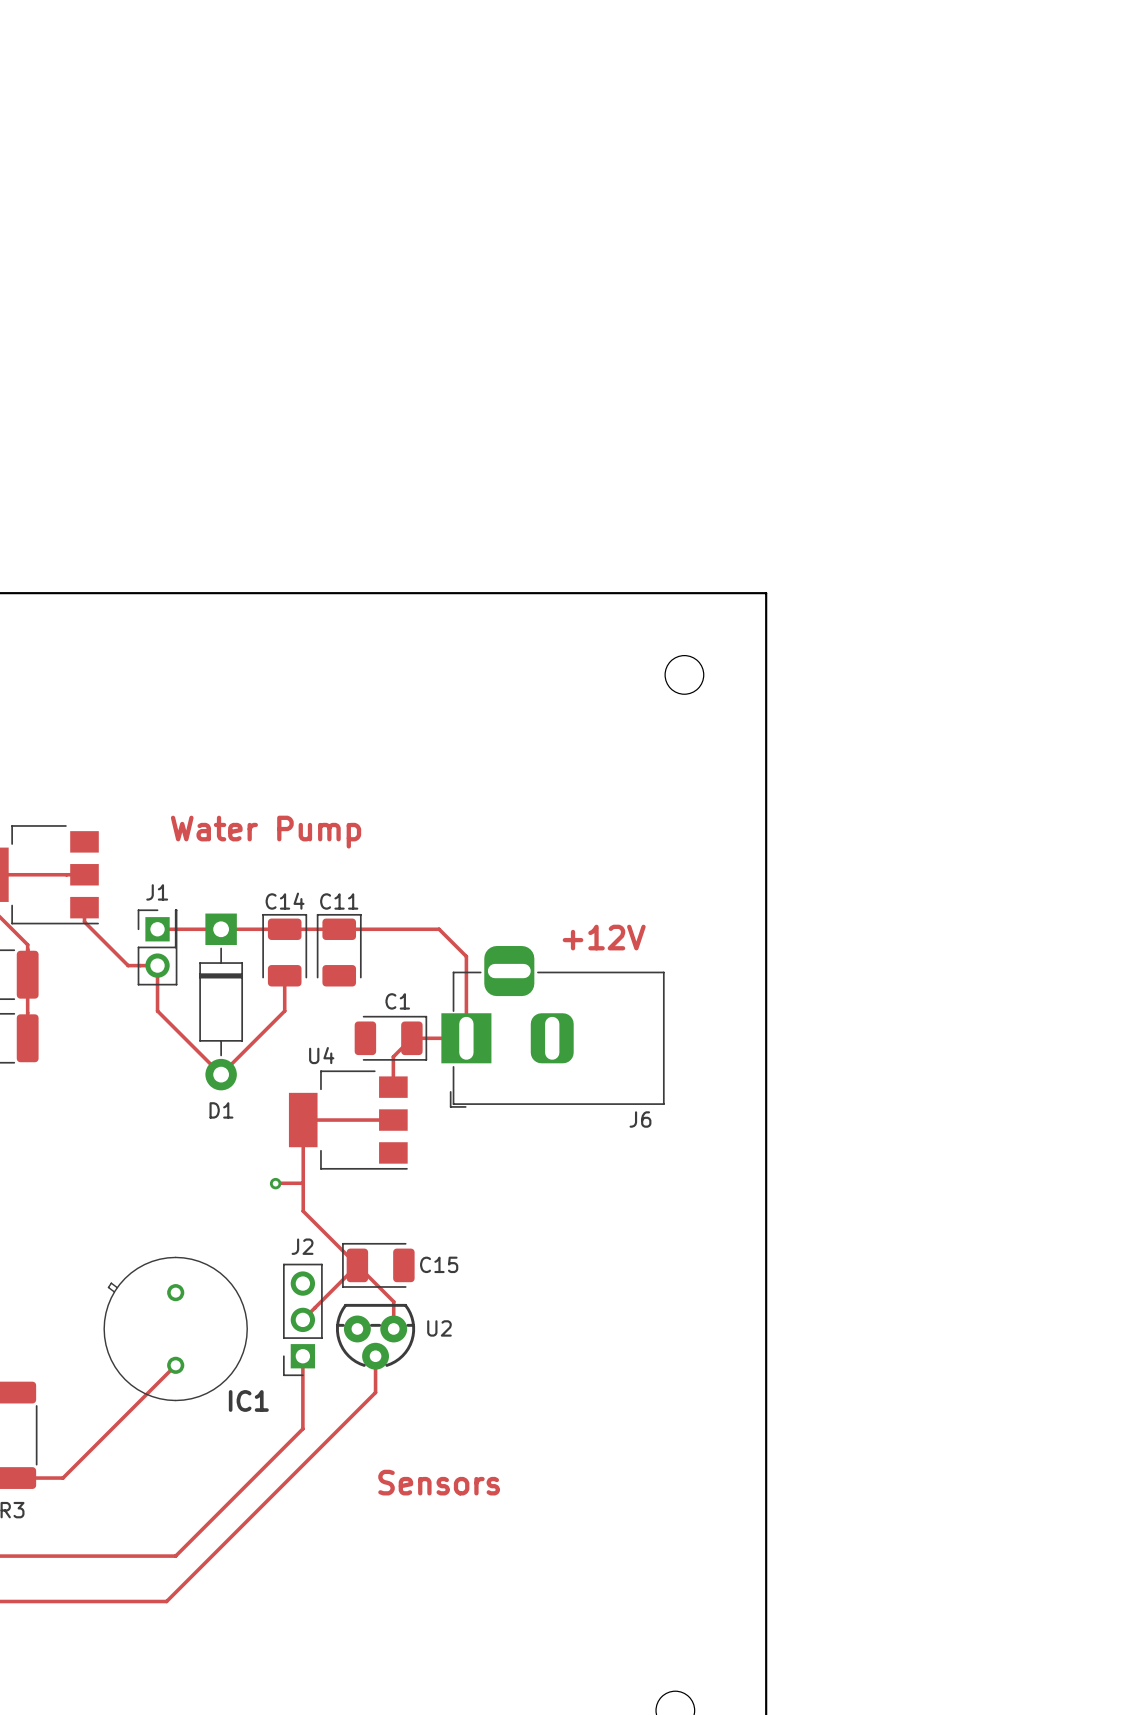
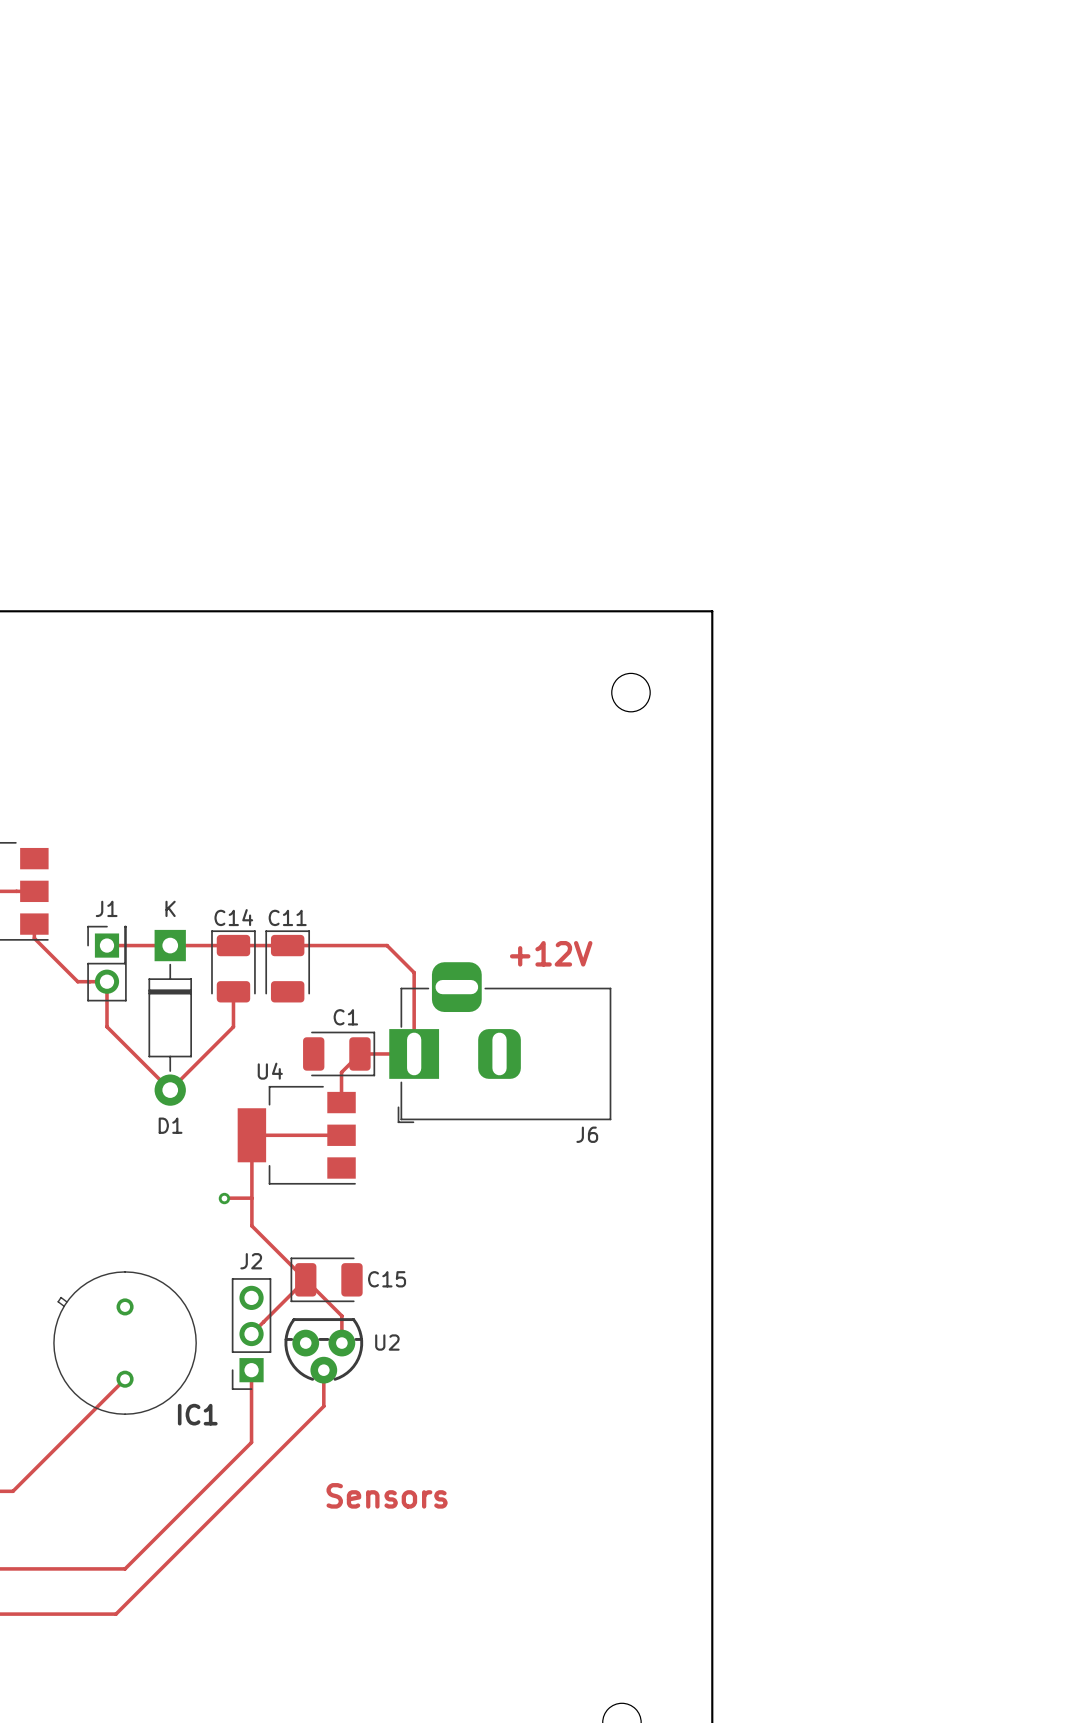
text: Water Pump (266, 832) -> none
D1 text: none -> K (170, 908)

